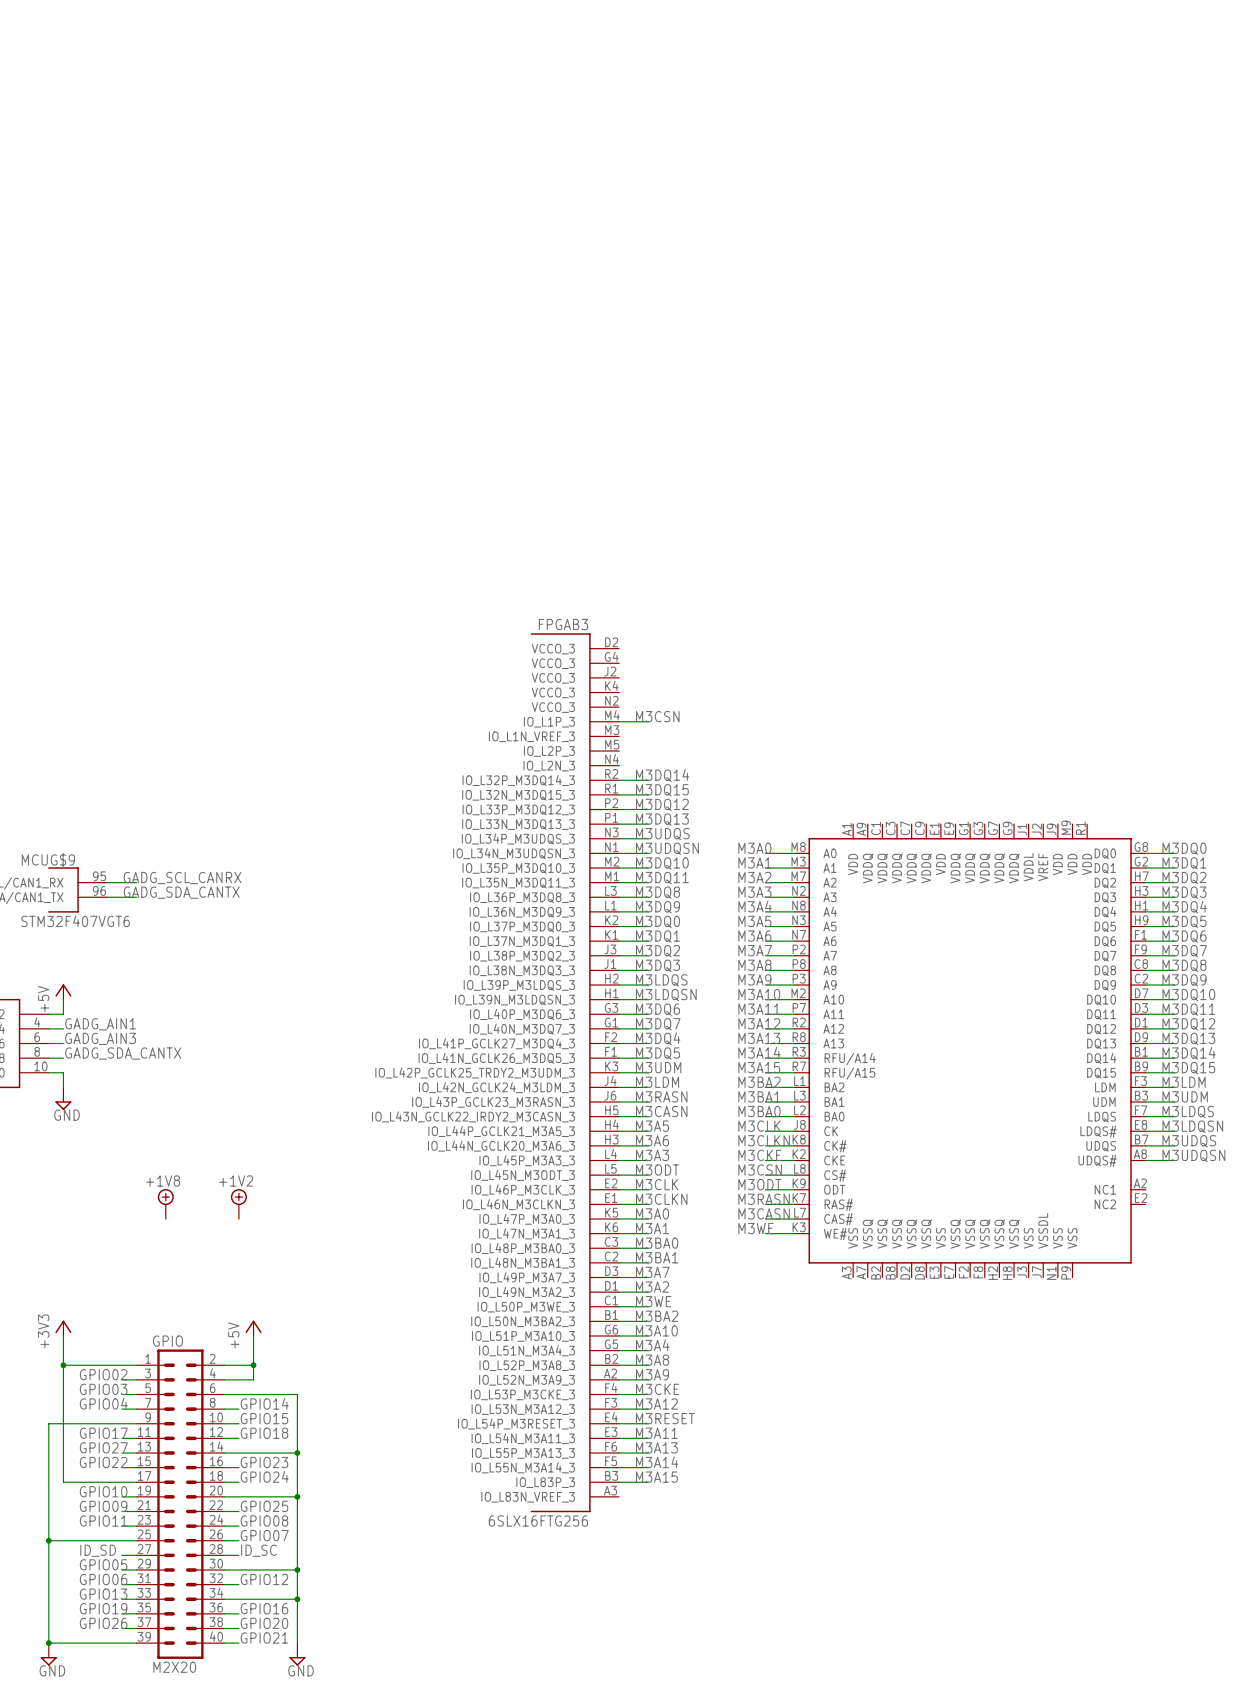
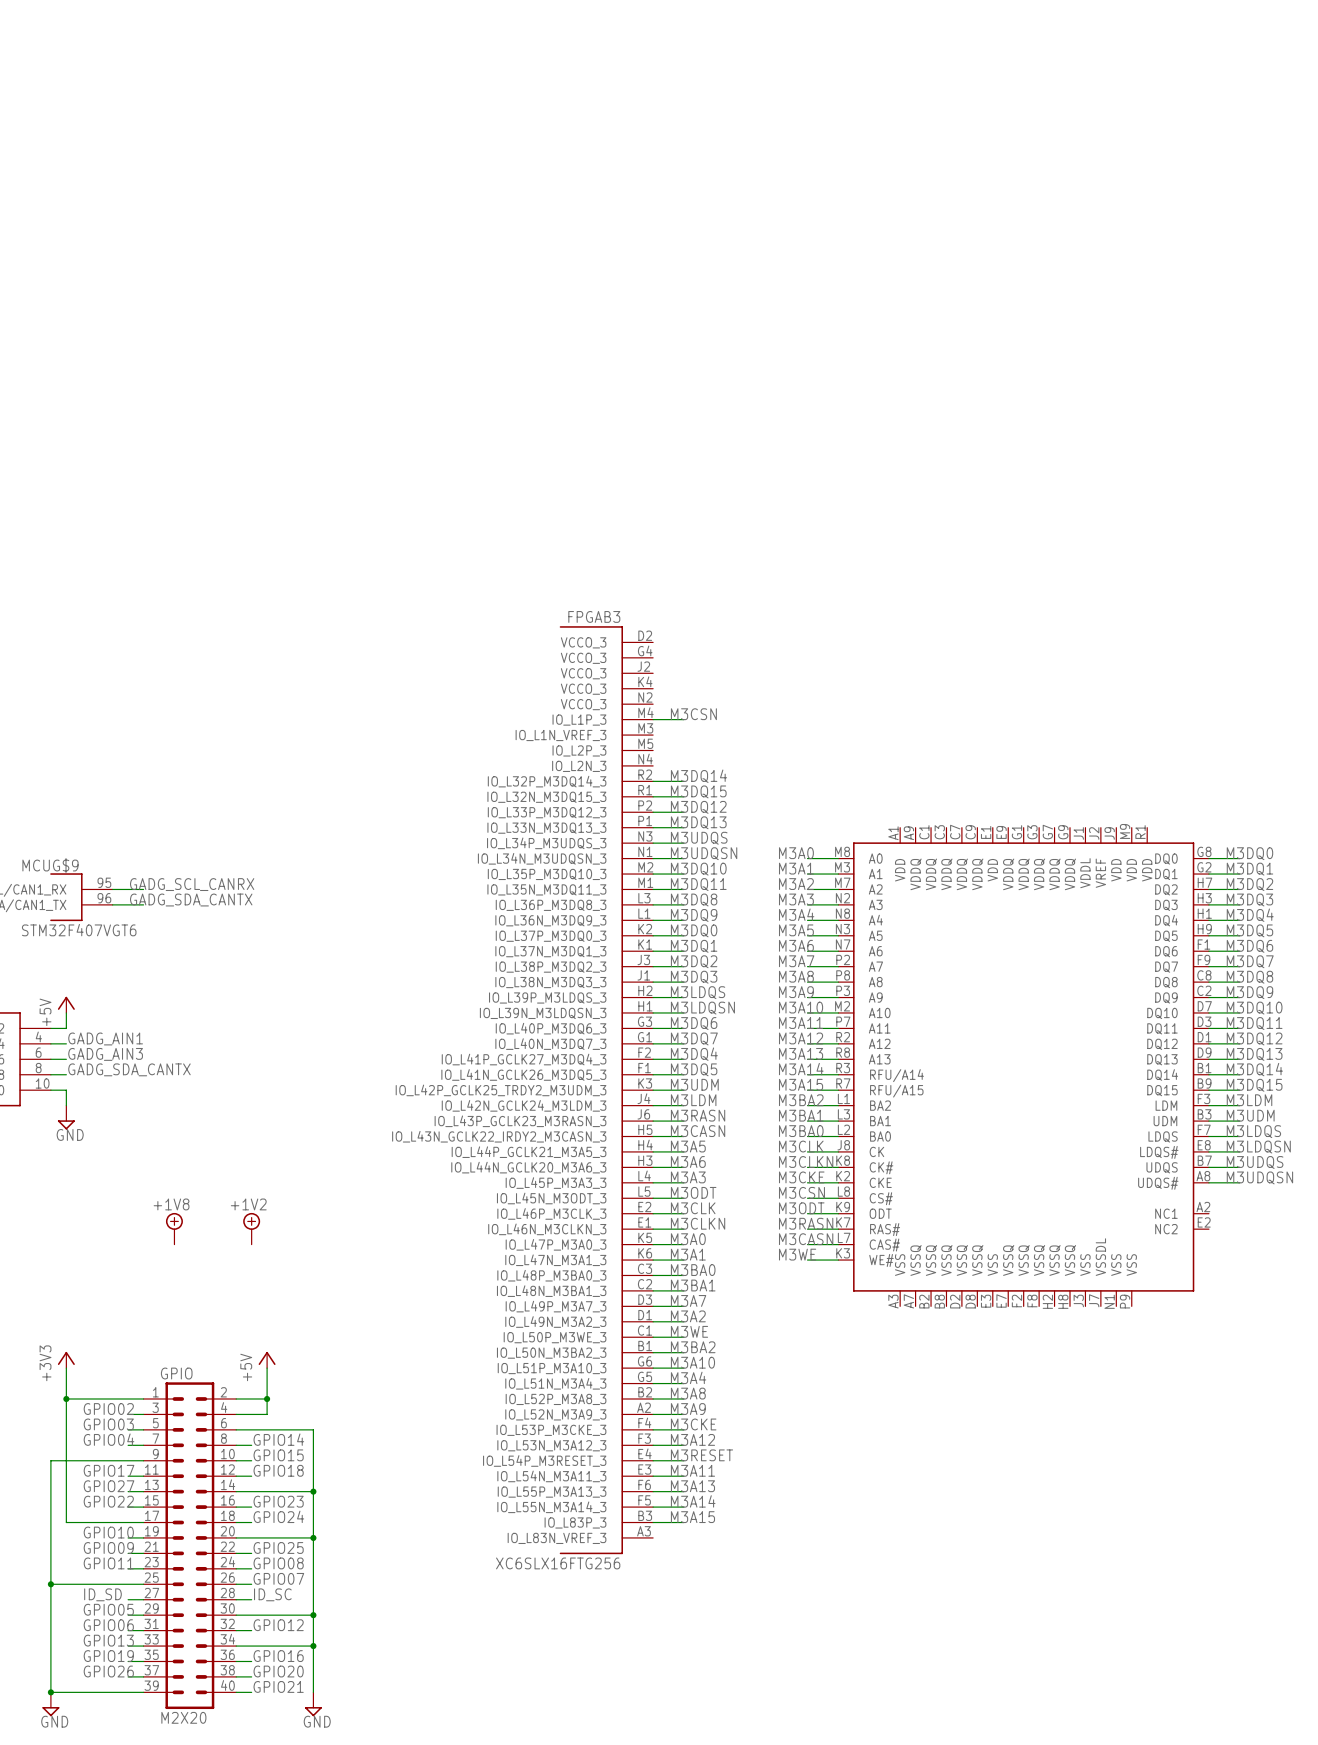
FPGAB3 value: 6SLX16FTG256 (538, 1520) -> XC6SLX16FTG256 (558, 1563)

